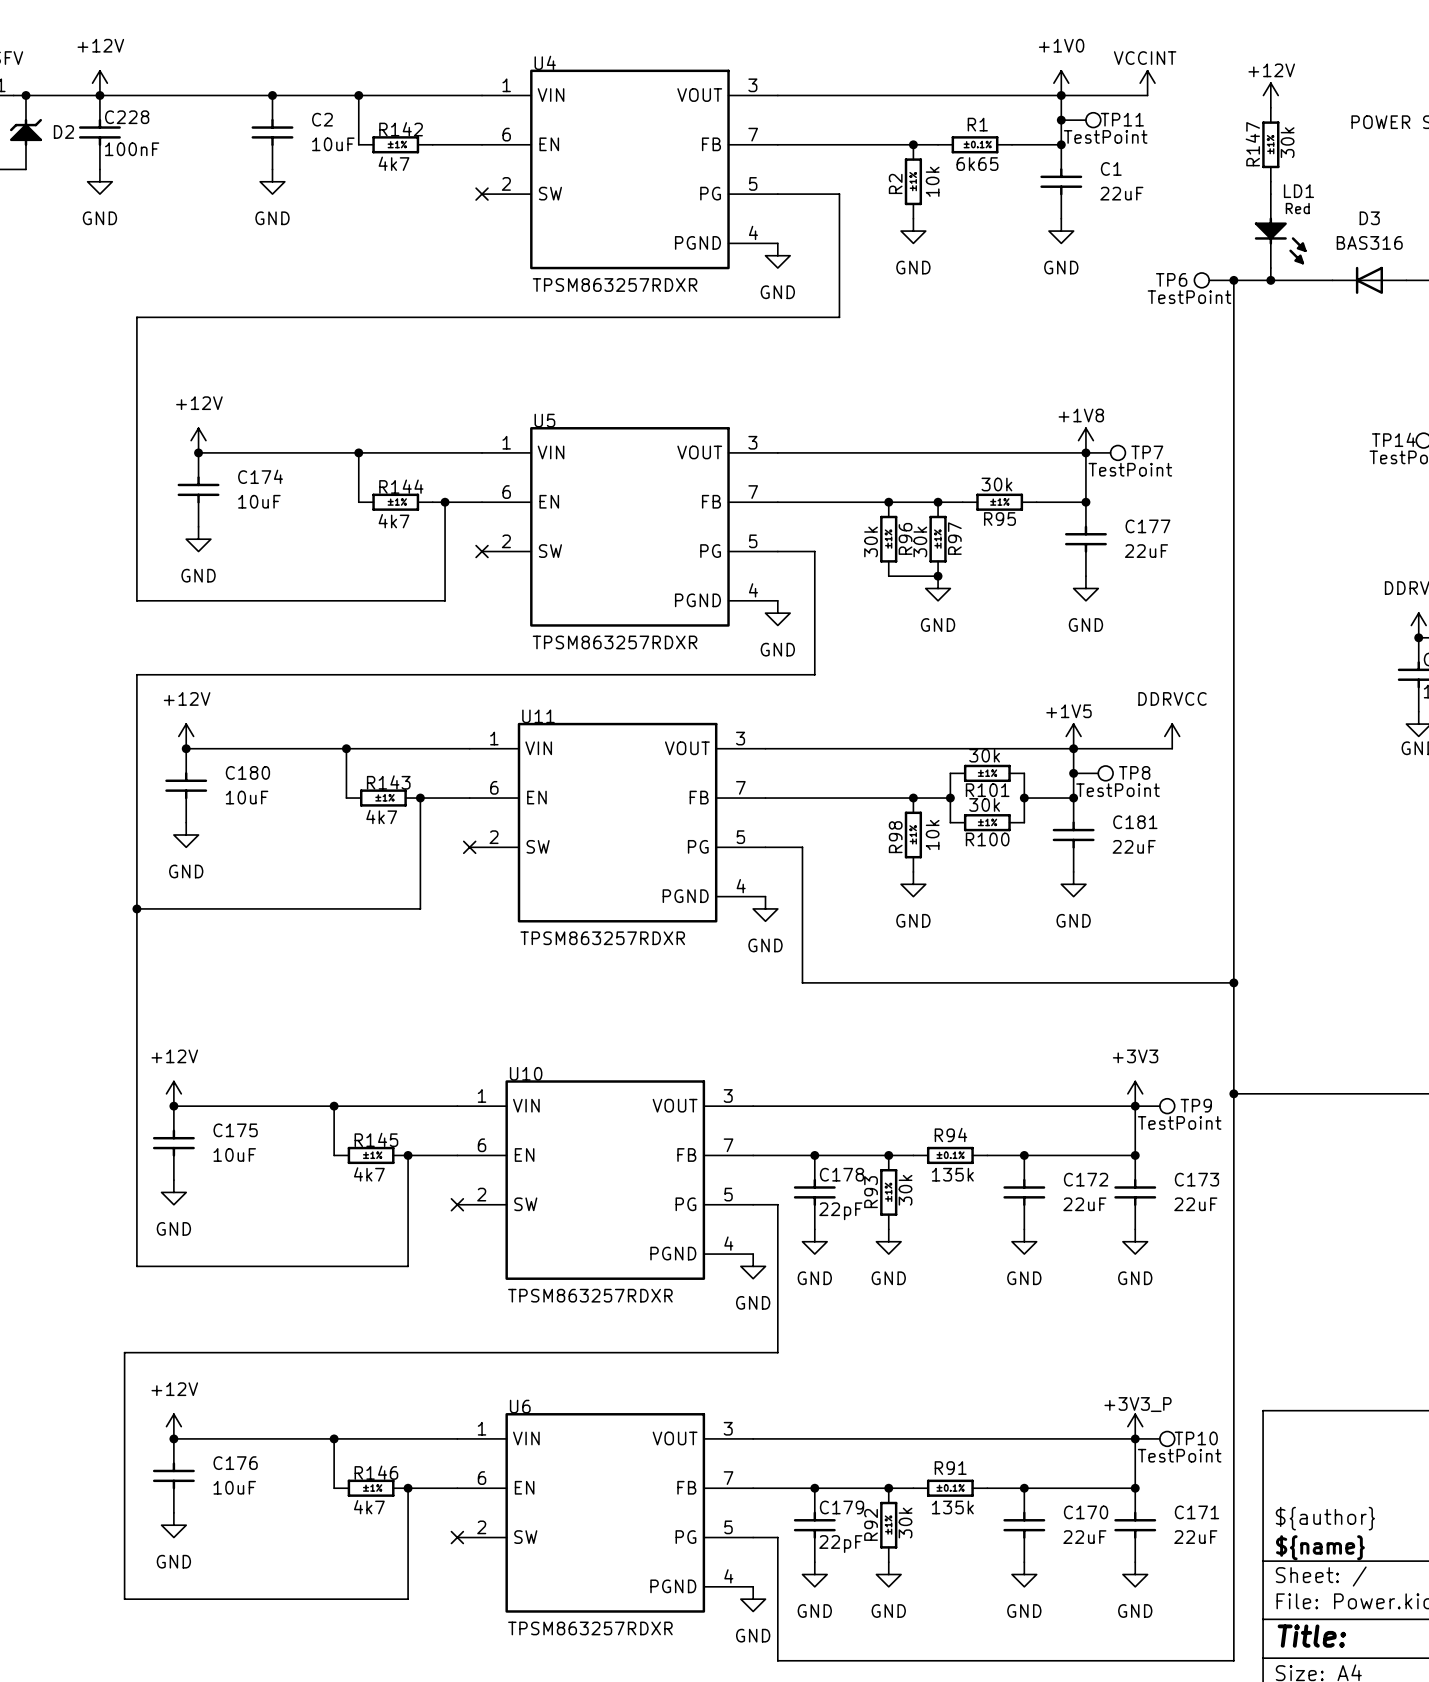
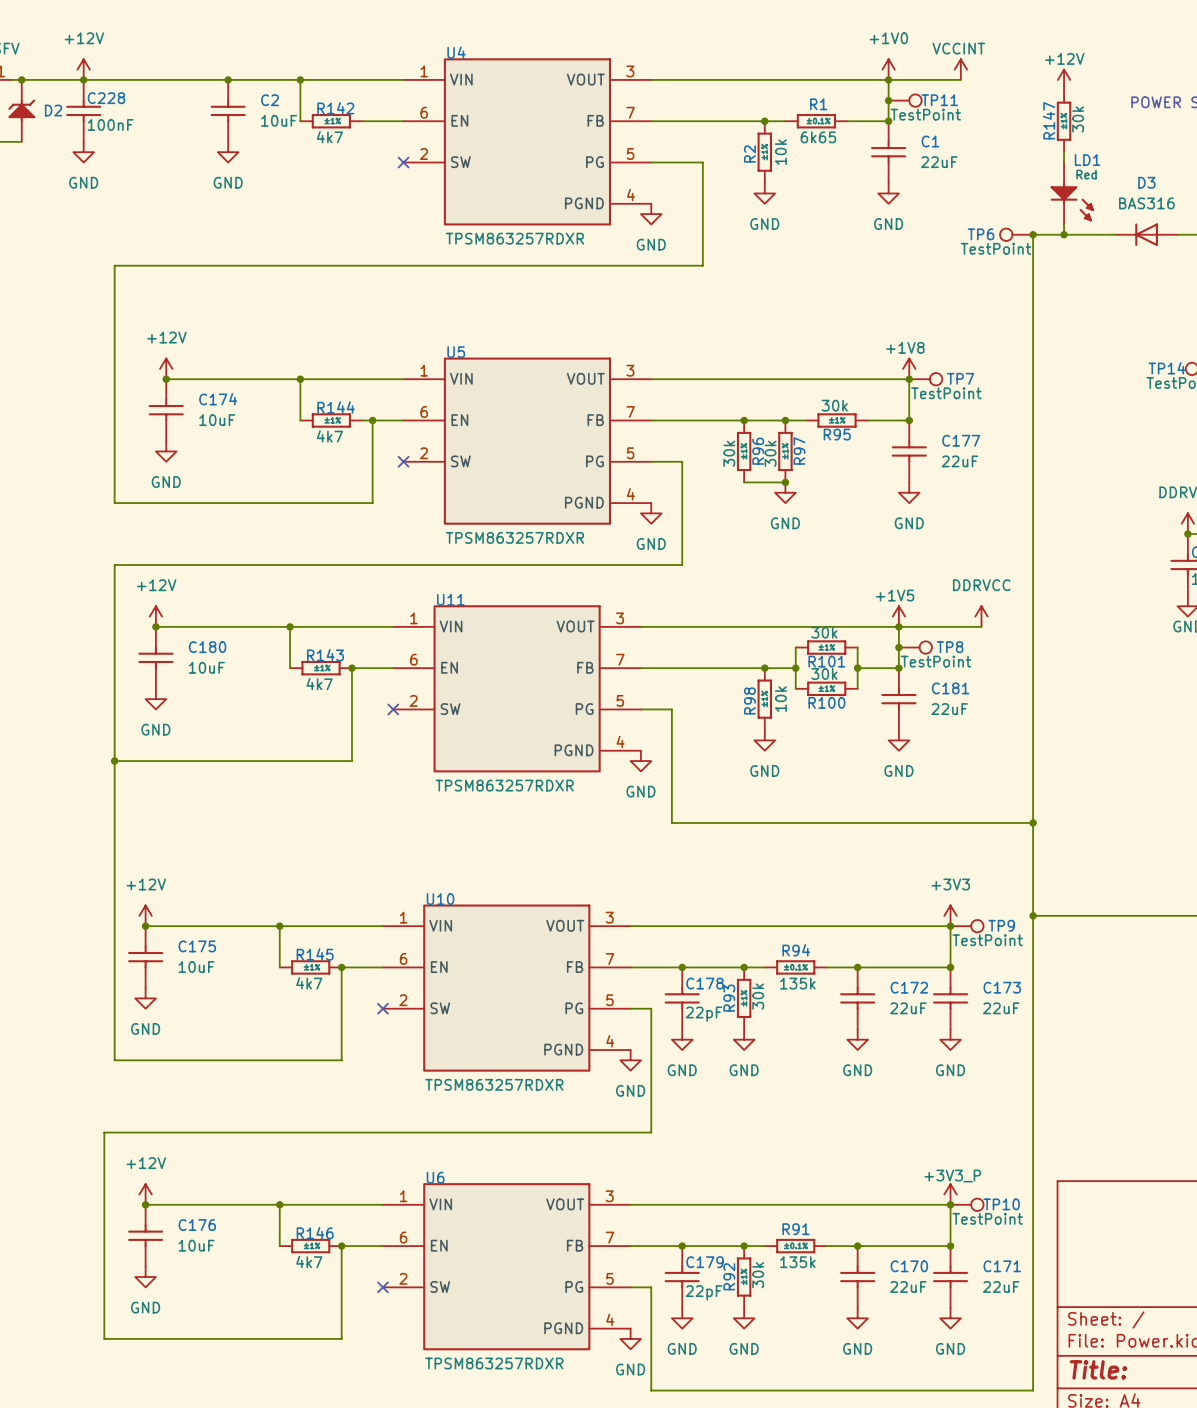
title block: ${author} (1325, 1518) -> none
title block: ${name} (1320, 1547) -> none

